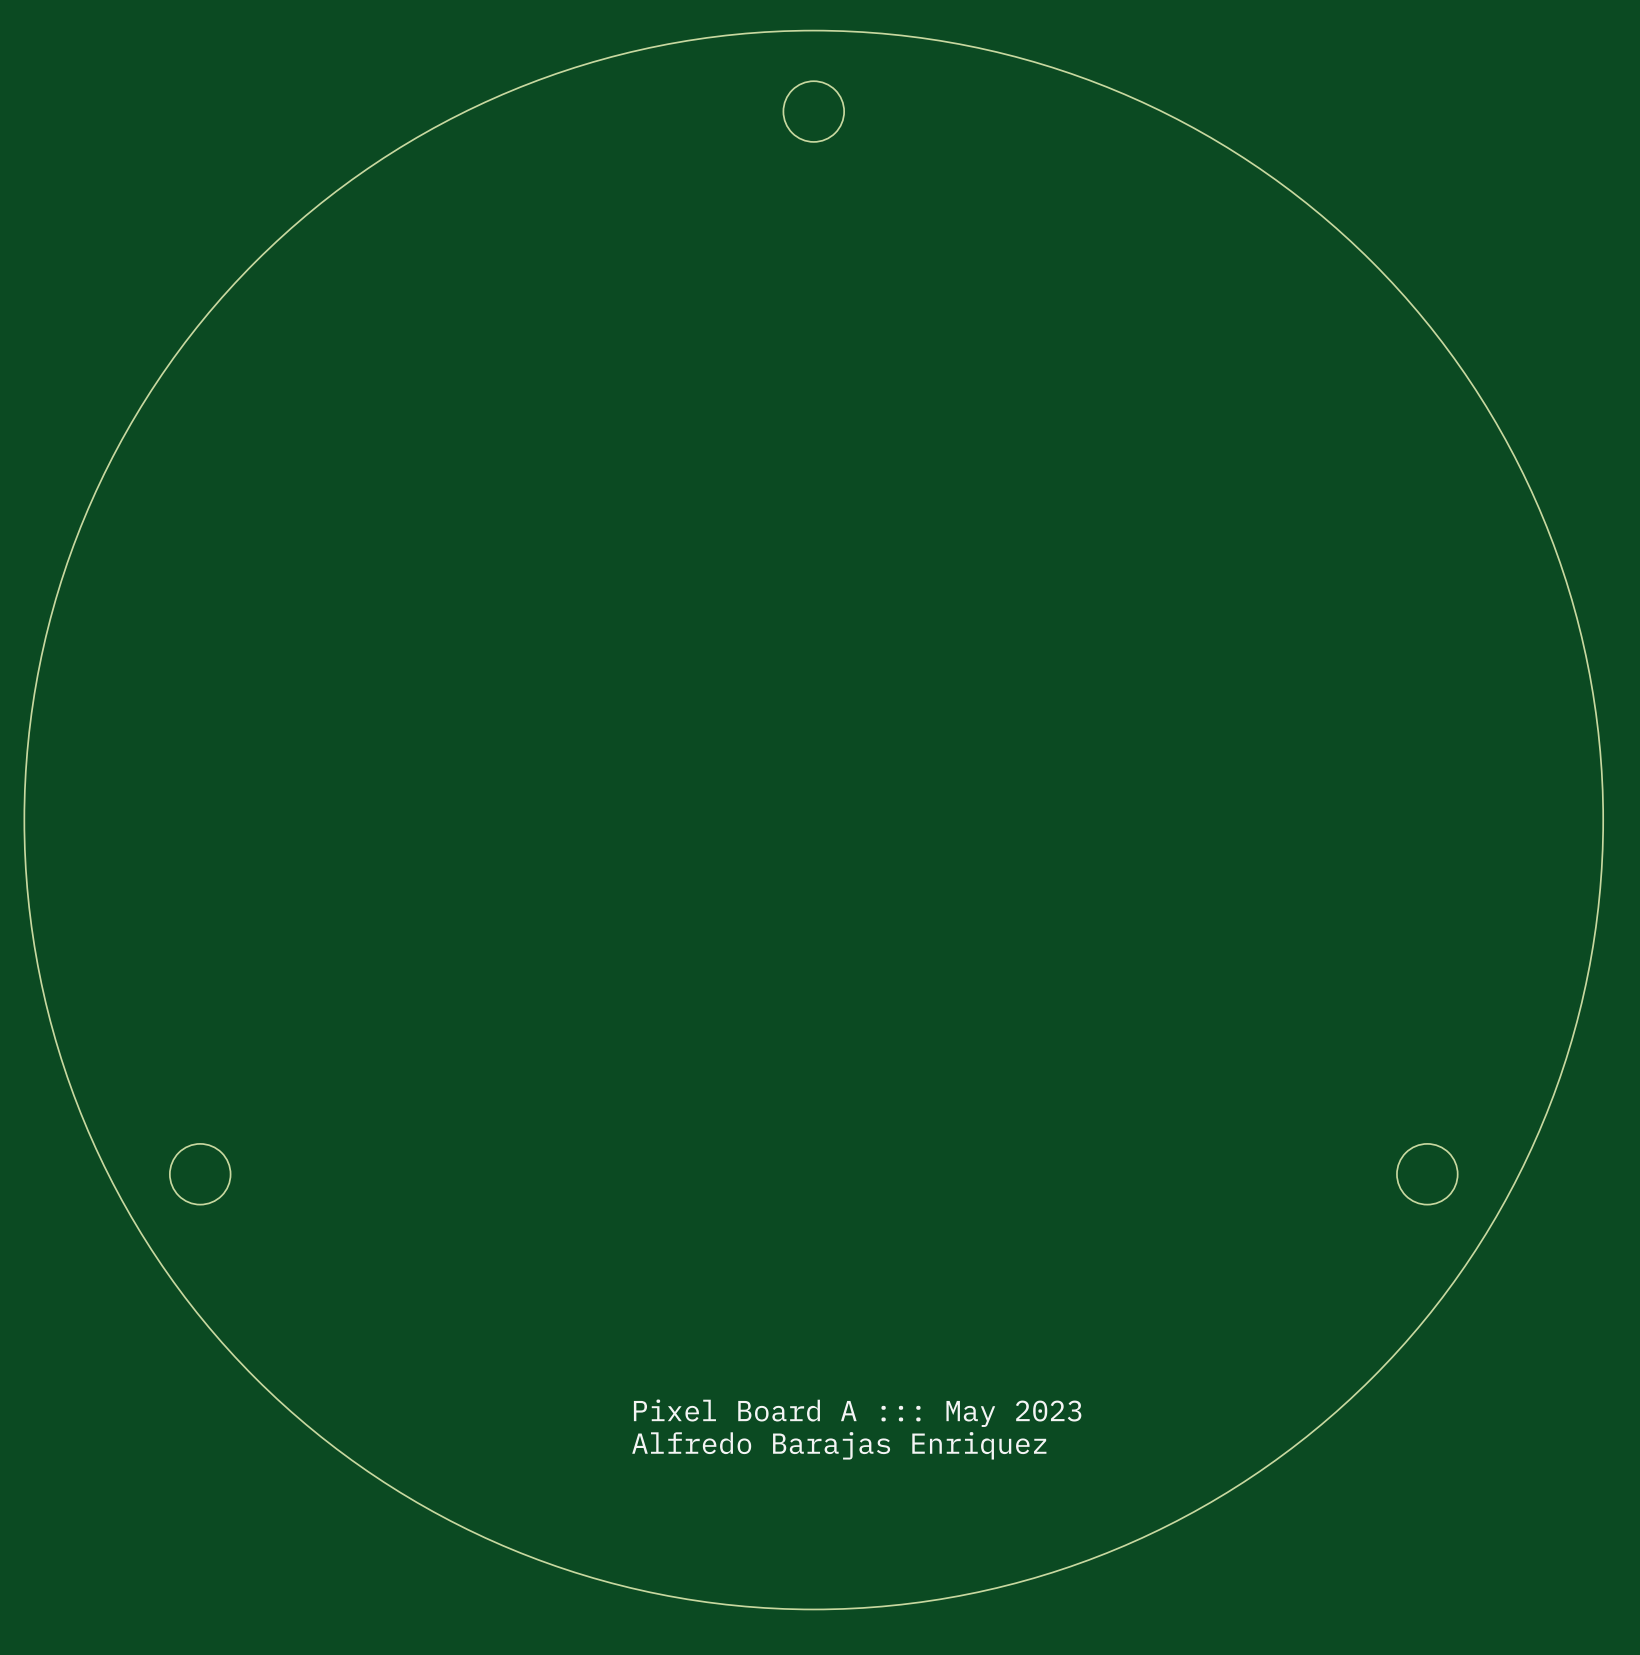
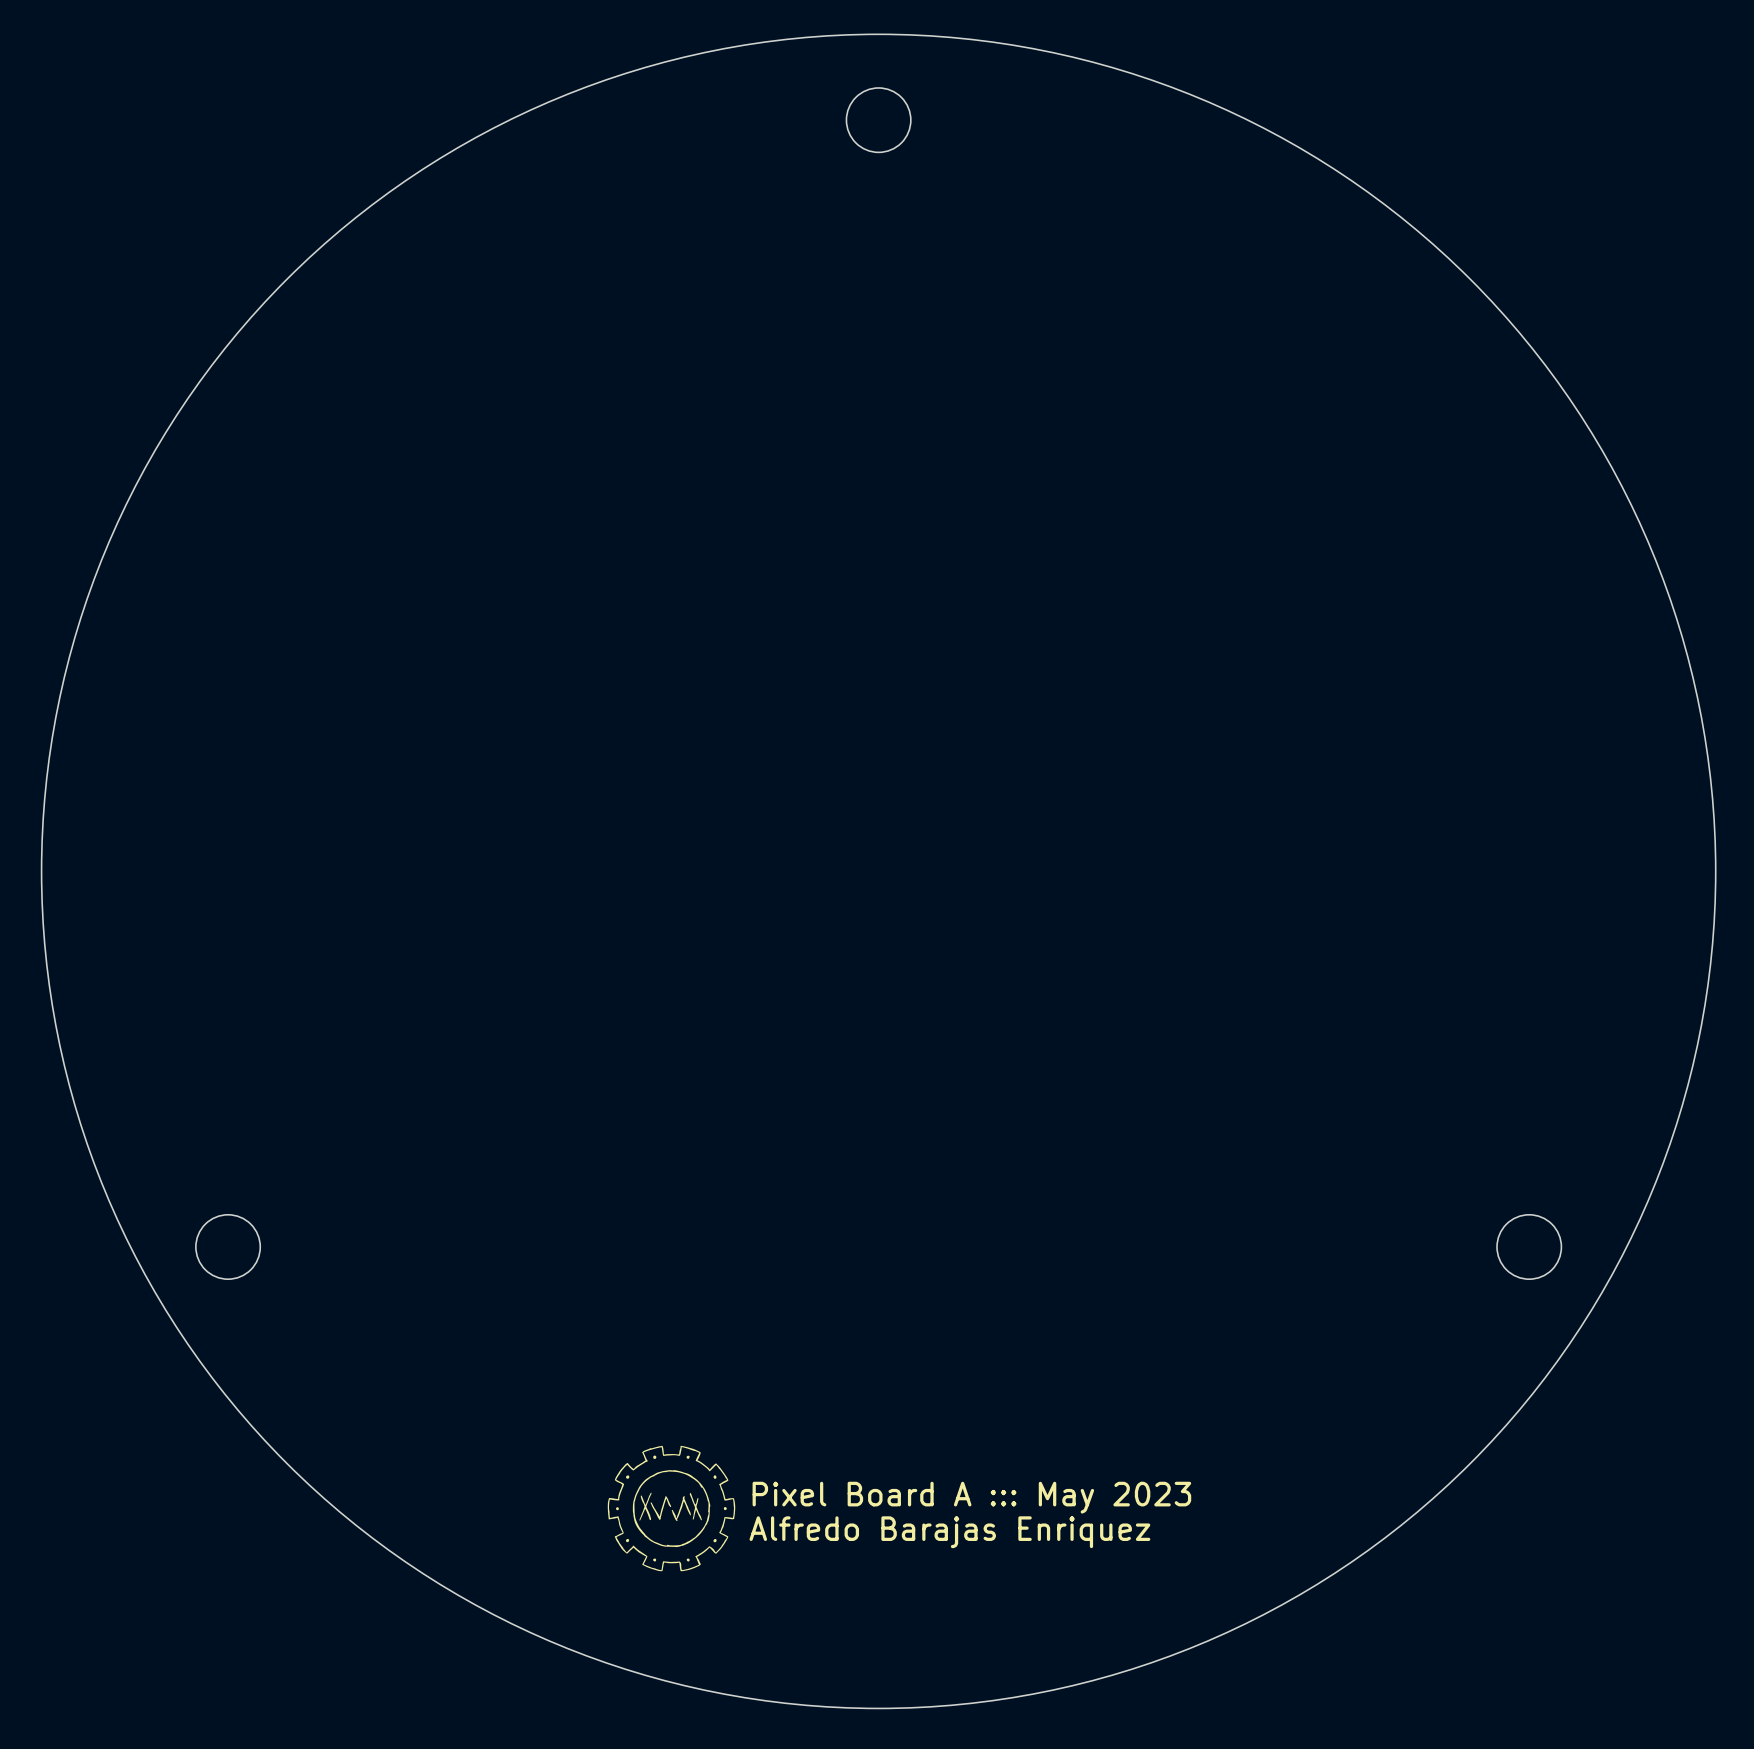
drawing: none -> [607, 1445, 736, 1572]
text position: Pixel Board A ::: May 2023 (857, 1413) -> Pixel Board A ::: May 2023 (971, 1497)
text position: Alfredo Barajas Enriquez (839, 1445) -> Alfredo Barajas Enriquez (949, 1532)

